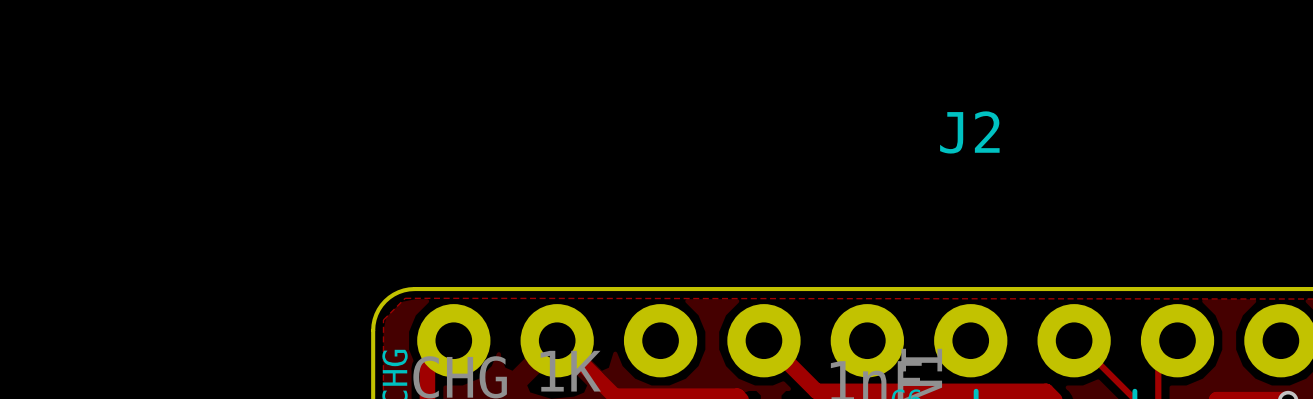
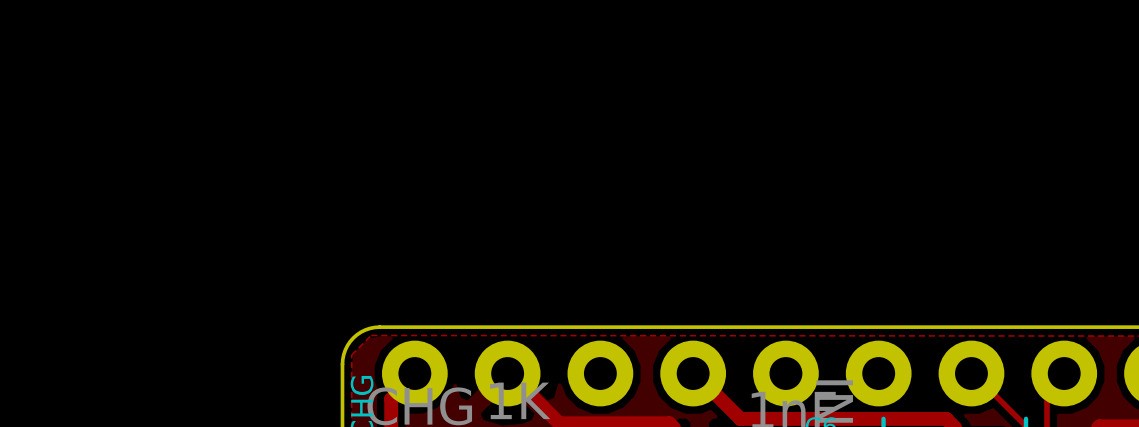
J2 name: J2 (969, 132) -> none

